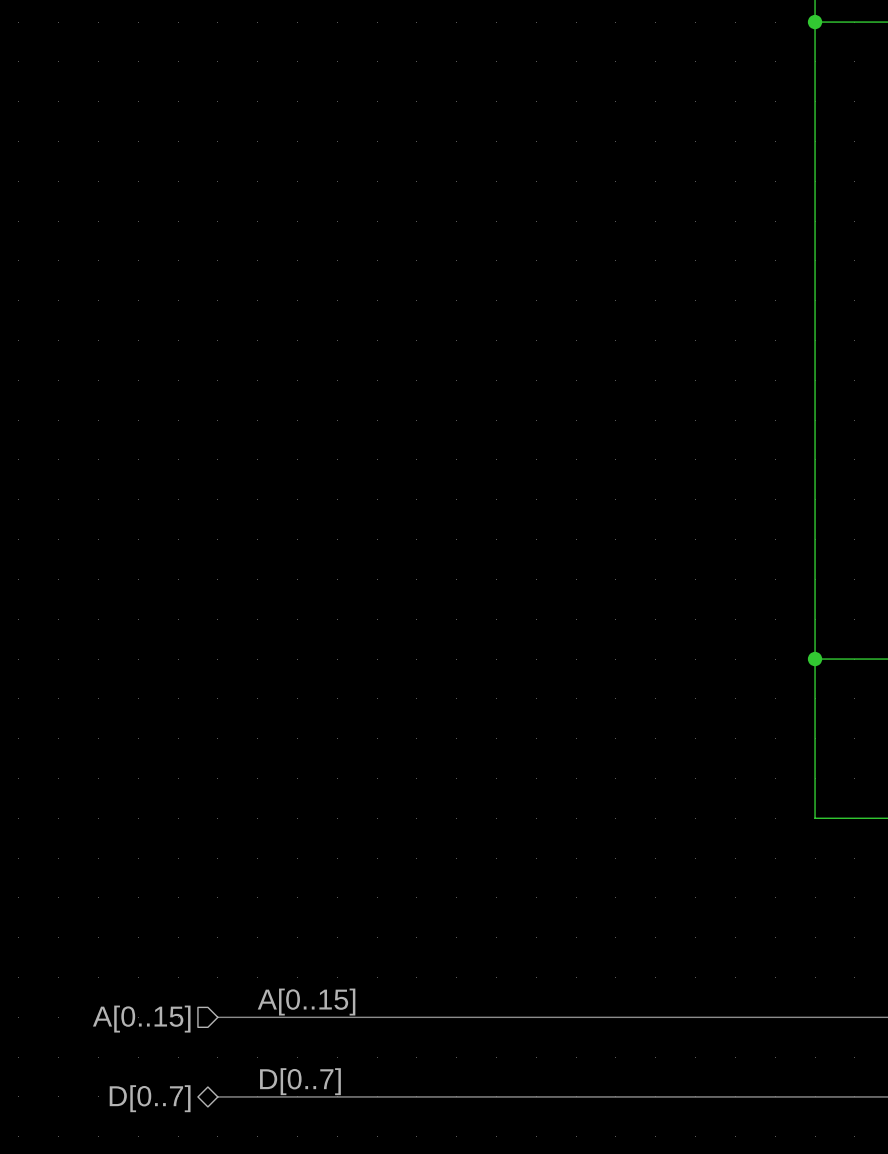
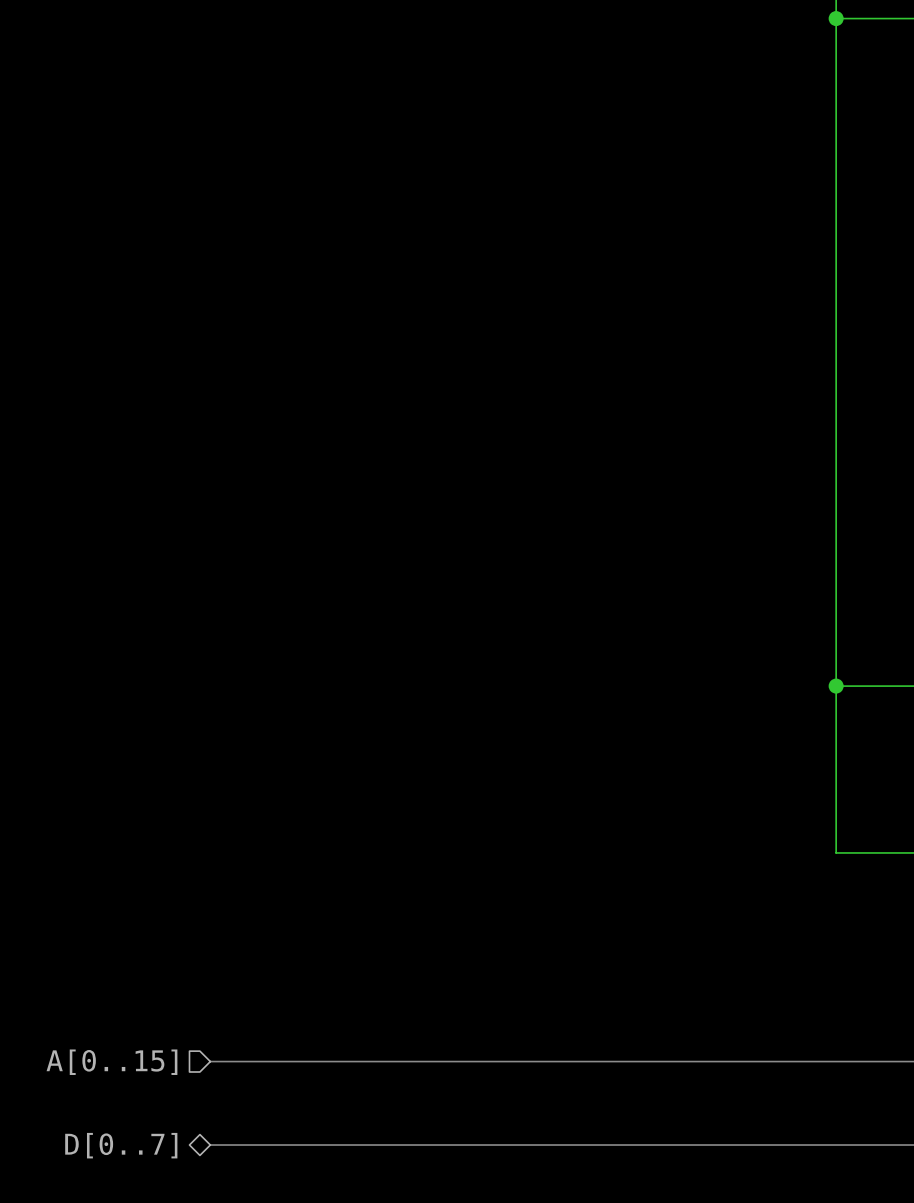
label: A[0..15] (306, 1002) -> none
label: D[0..7] (300, 1081) -> none

